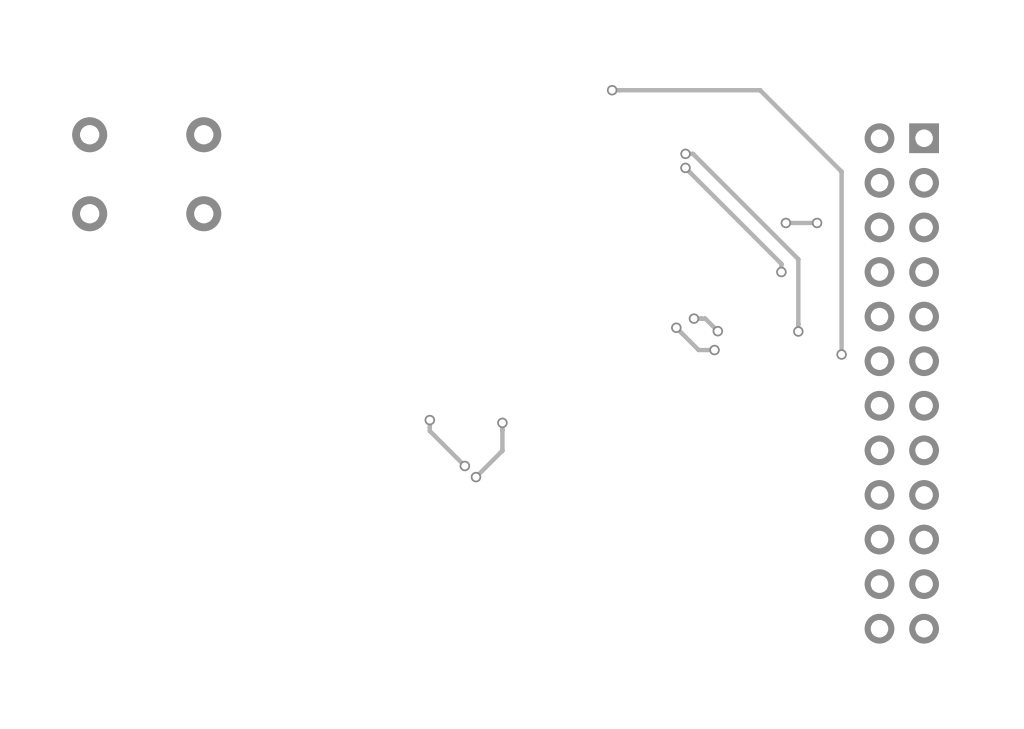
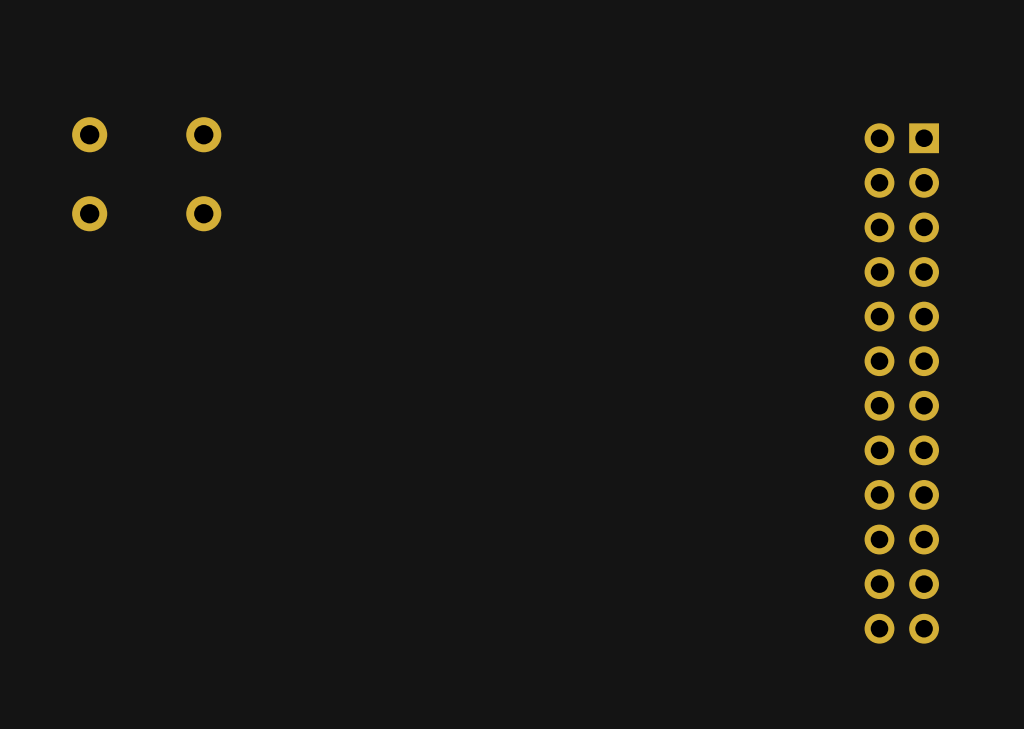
track: (612, 90) (760, 90) (841, 171) (841, 354) -> none
via: (612, 90) -> none
track: (685, 153) (692, 153) (798, 259) (798, 331) -> none
via: (685, 153) -> none
track: (685, 167) (781, 263) (781, 272) -> none
via: (685, 167) -> none
via: (785, 222) -> none
track: (817, 222) (785, 222) -> none
via: (817, 222) -> none
via: (781, 272) -> none
track: (693, 318) (705, 318) (717, 331) -> none
via: (693, 318) -> none
track: (676, 327) (698, 350) (714, 350) -> none
via: (676, 327) -> none
via: (717, 331) -> none
via: (798, 331) -> none
via: (714, 350) -> none
via: (841, 354) -> none
track: (429, 420) (429, 430) (464, 465) -> none
via: (429, 420) -> none
track: (502, 422) (502, 450) (475, 477) -> none
via: (502, 422) -> none
via: (464, 465) -> none
via: (475, 477) -> none

